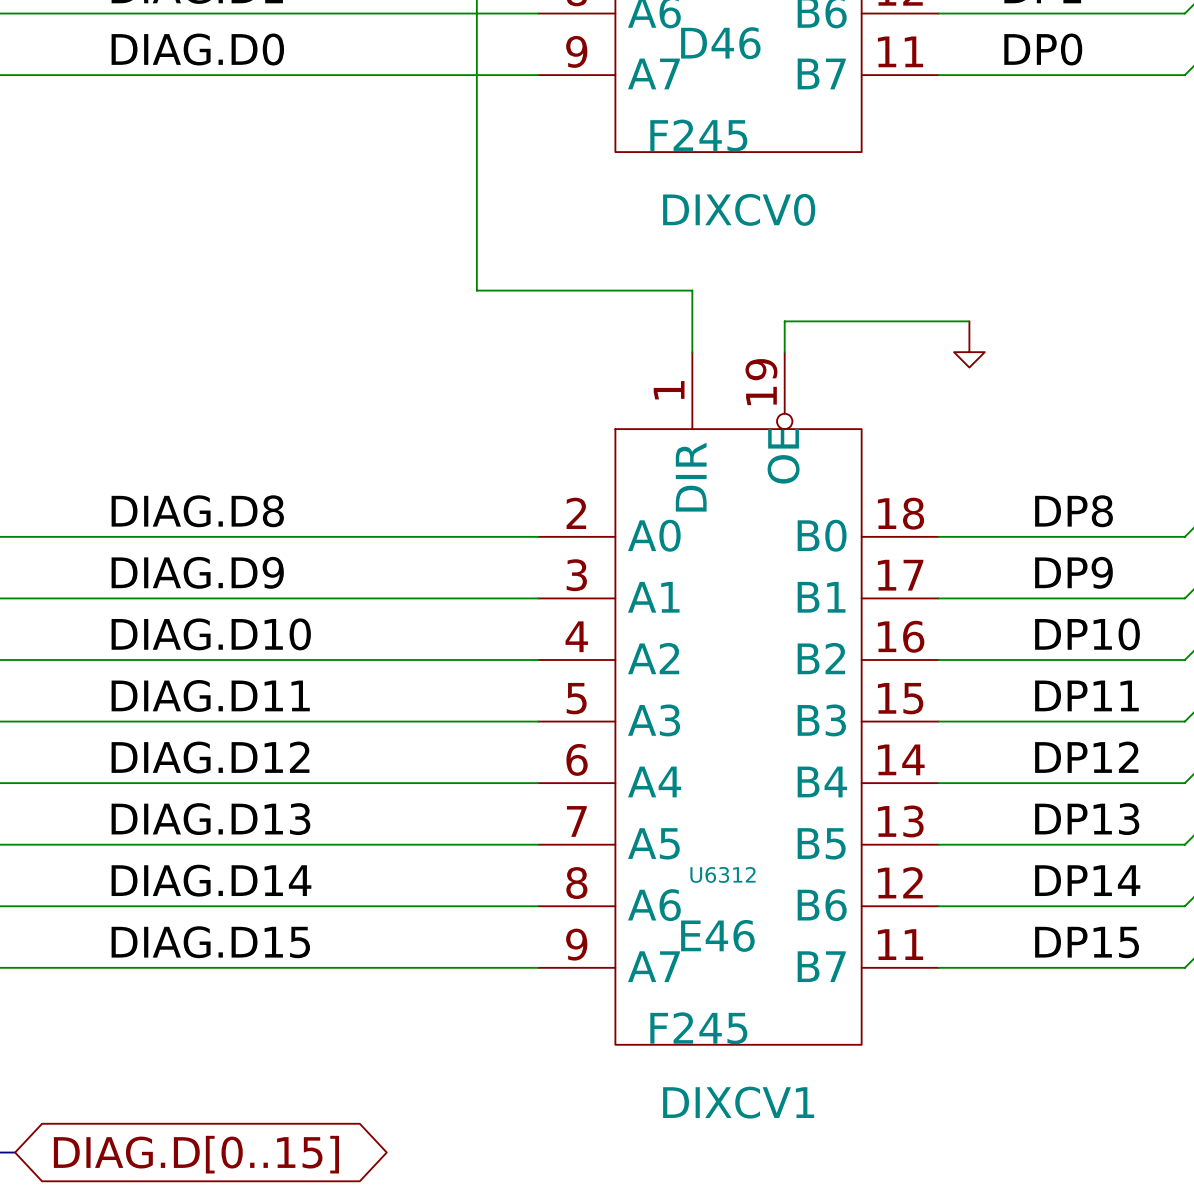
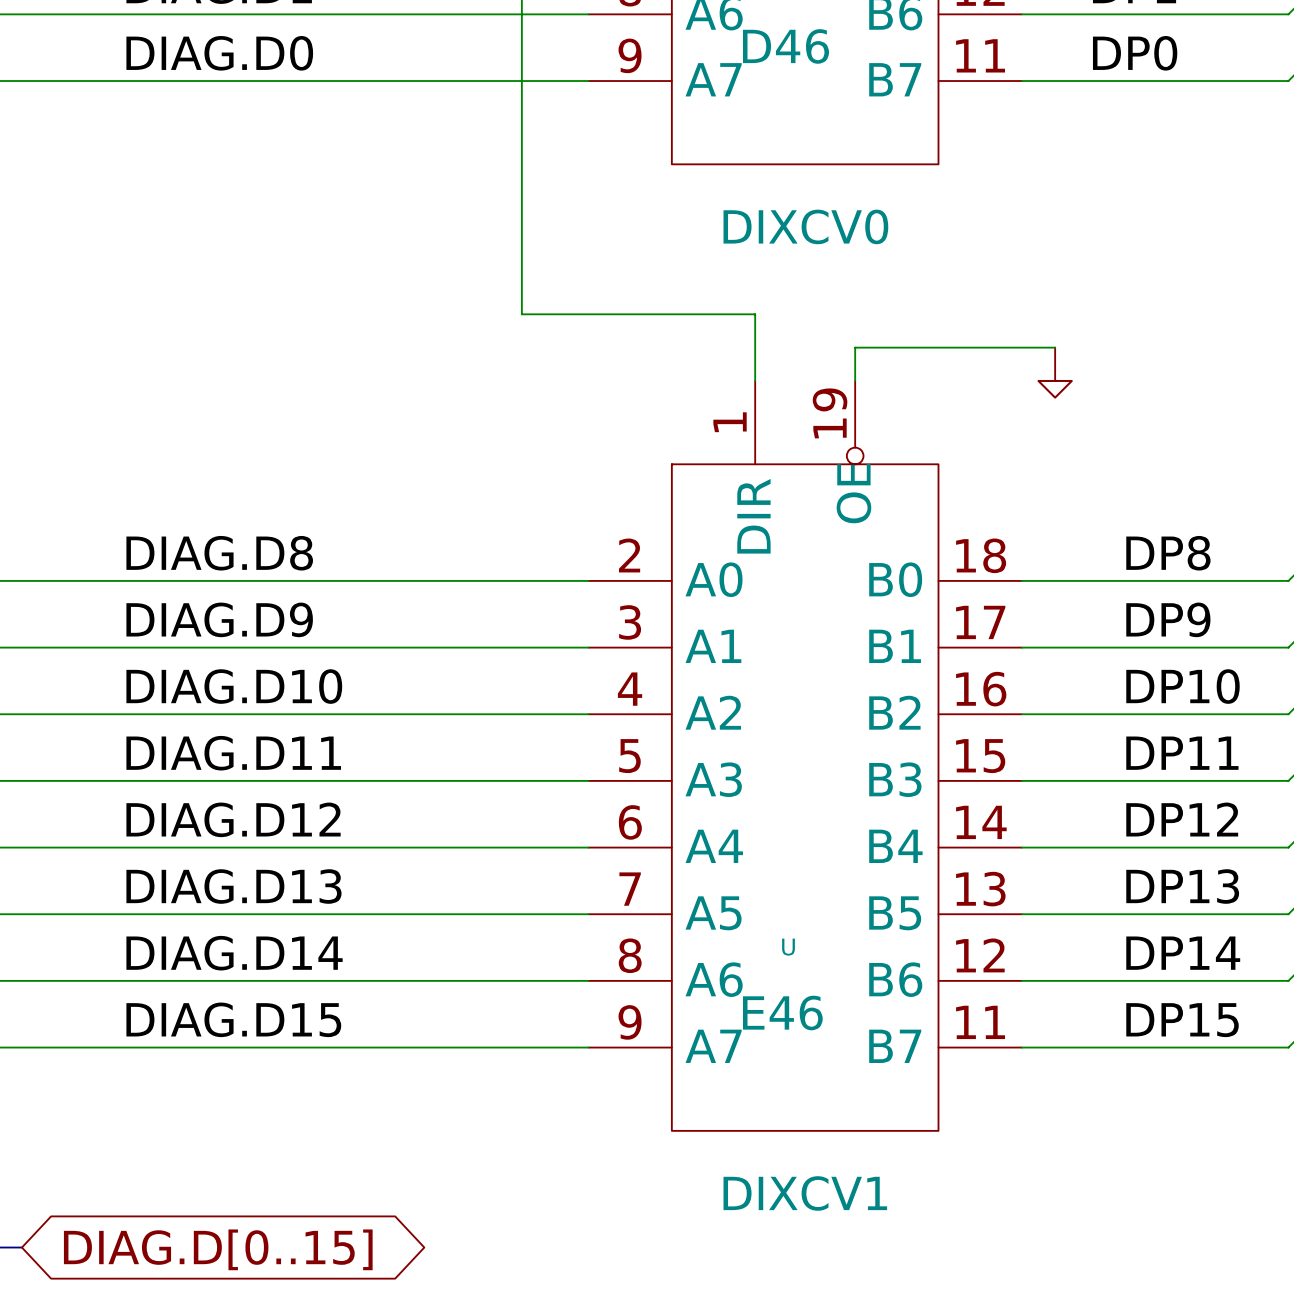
part value: F245 (698, 135) -> none
U6312 name: U6312 (722, 874) -> U (788, 947)
U6312 value: F245 (698, 1028) -> none

